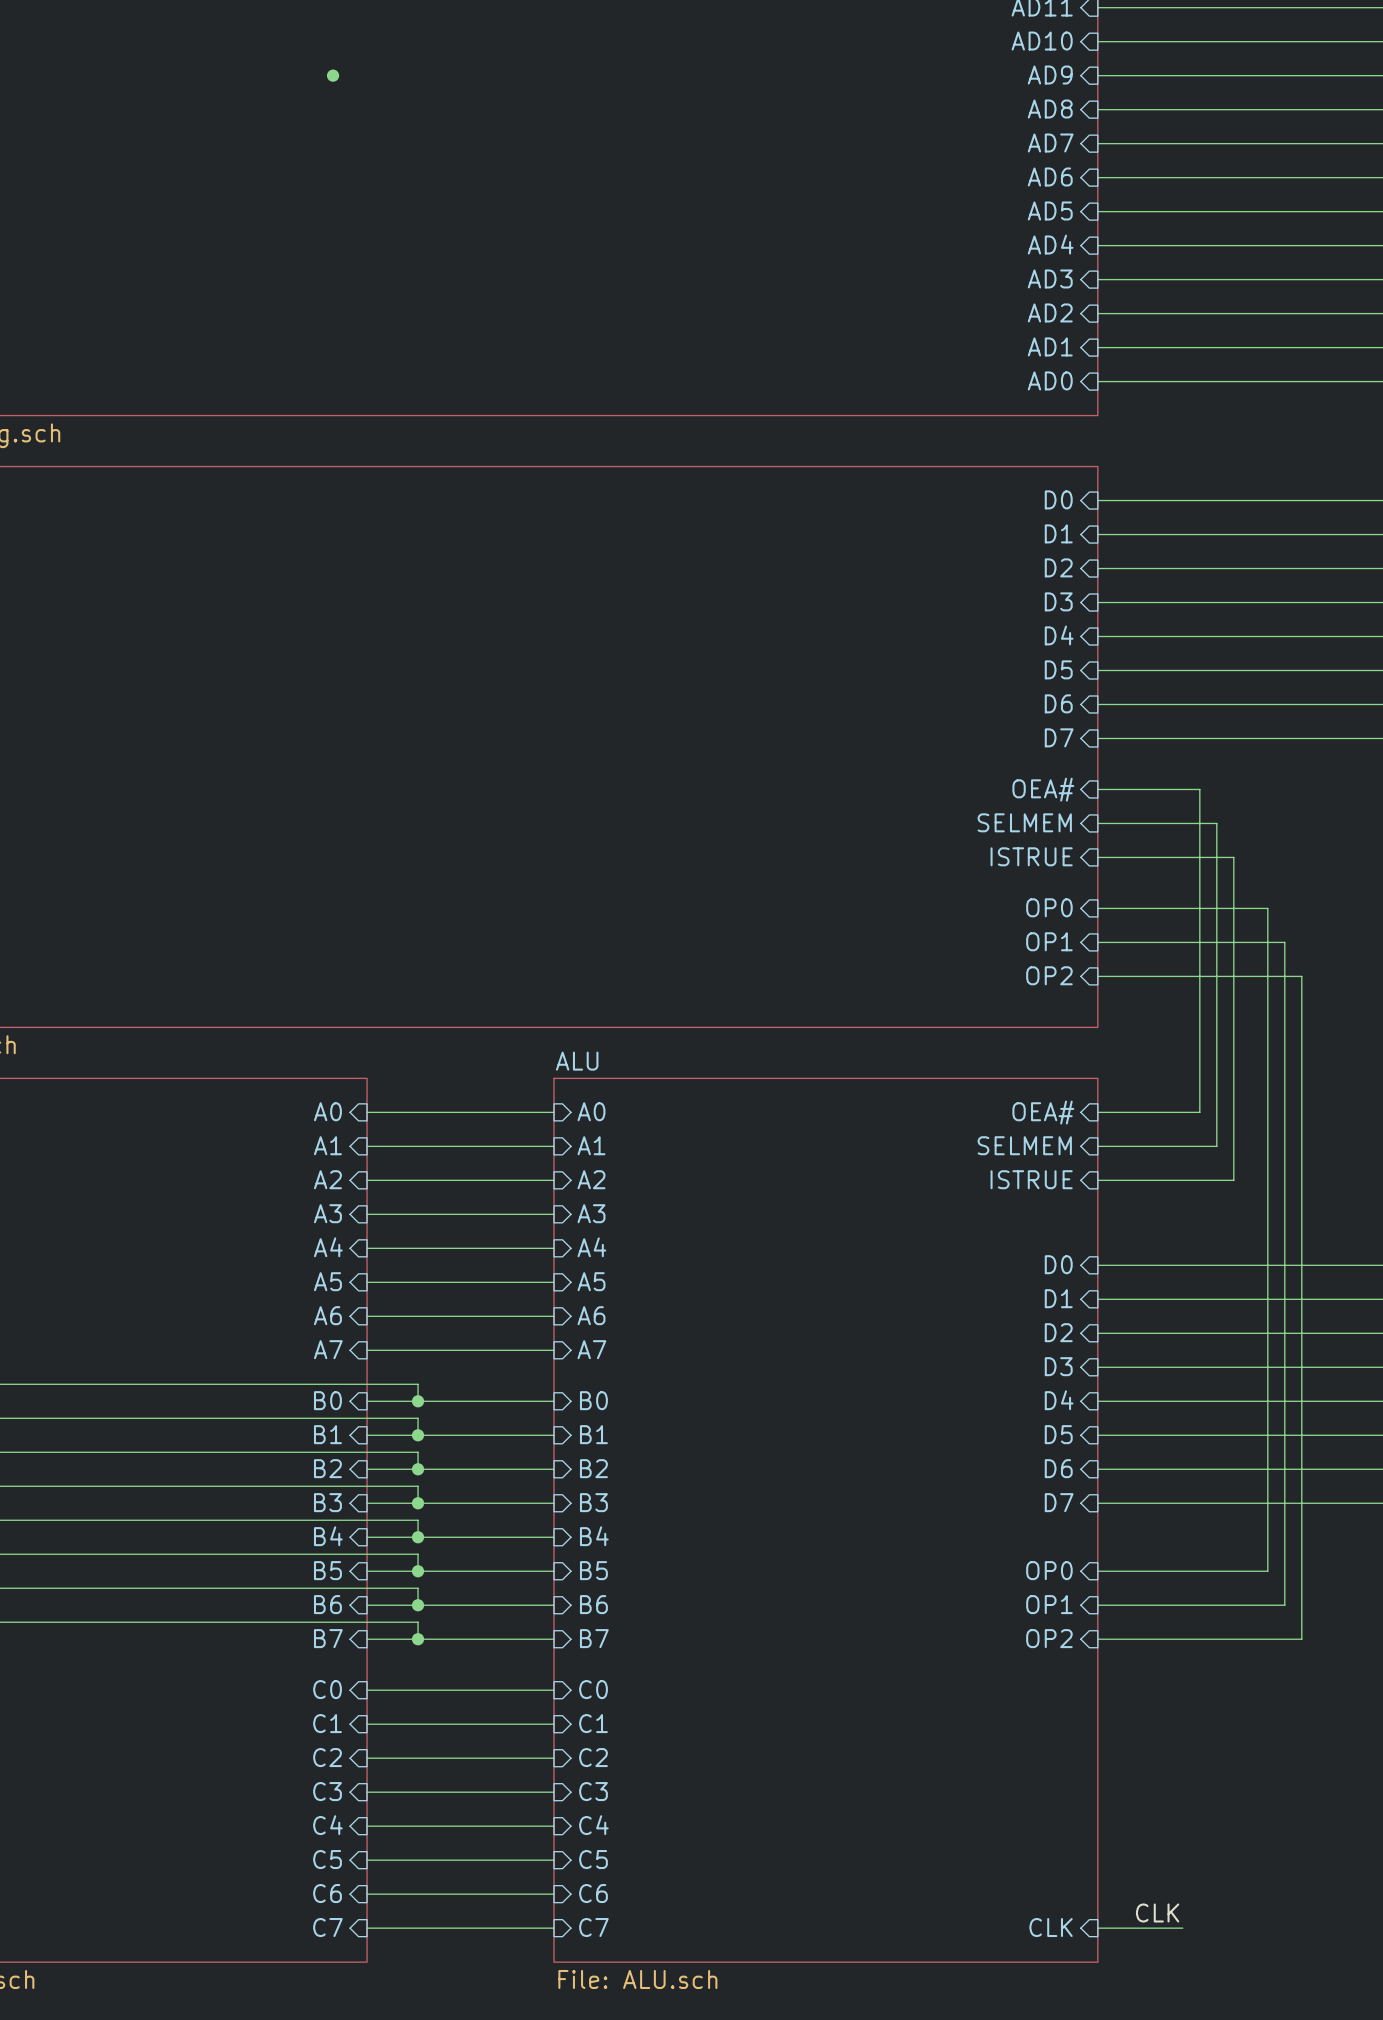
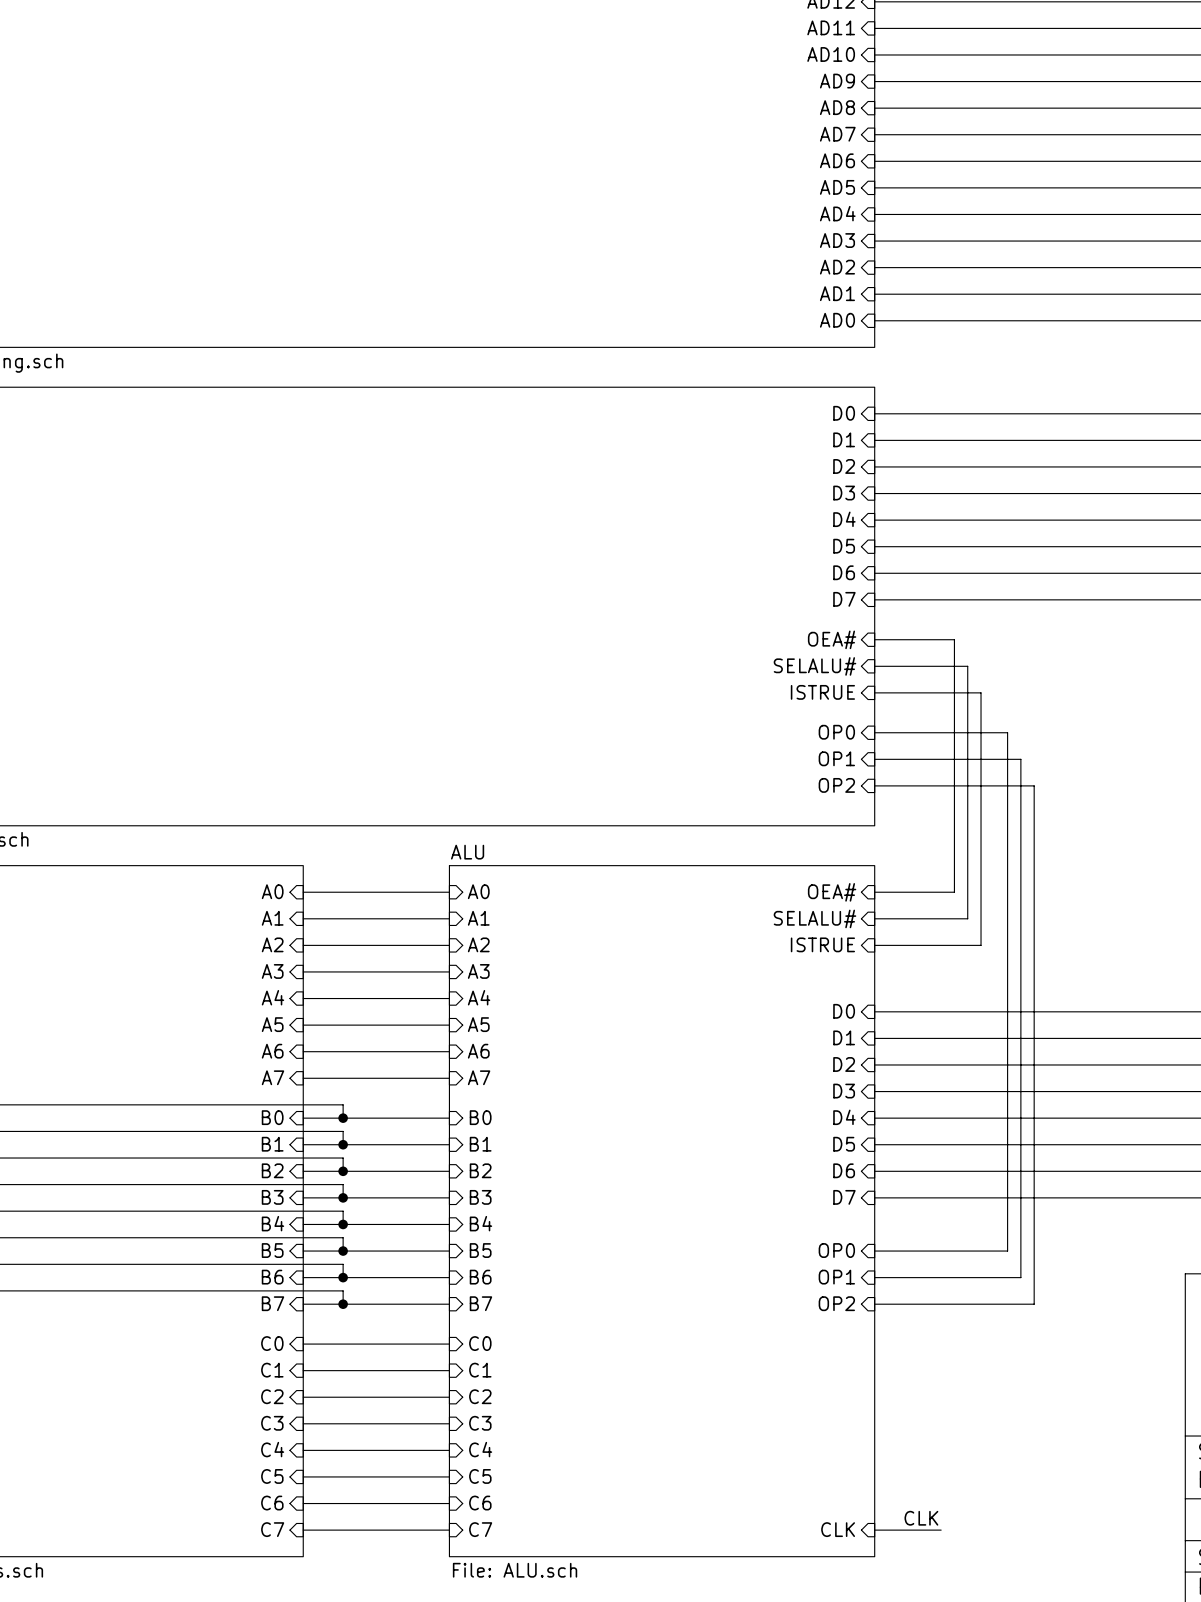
junction: (333, 75) -> none
sheet pin: SELMEM (1024, 822) -> SELALU# (815, 666)
sheet pin: SELMEM (1024, 1145) -> SELALU# (815, 918)

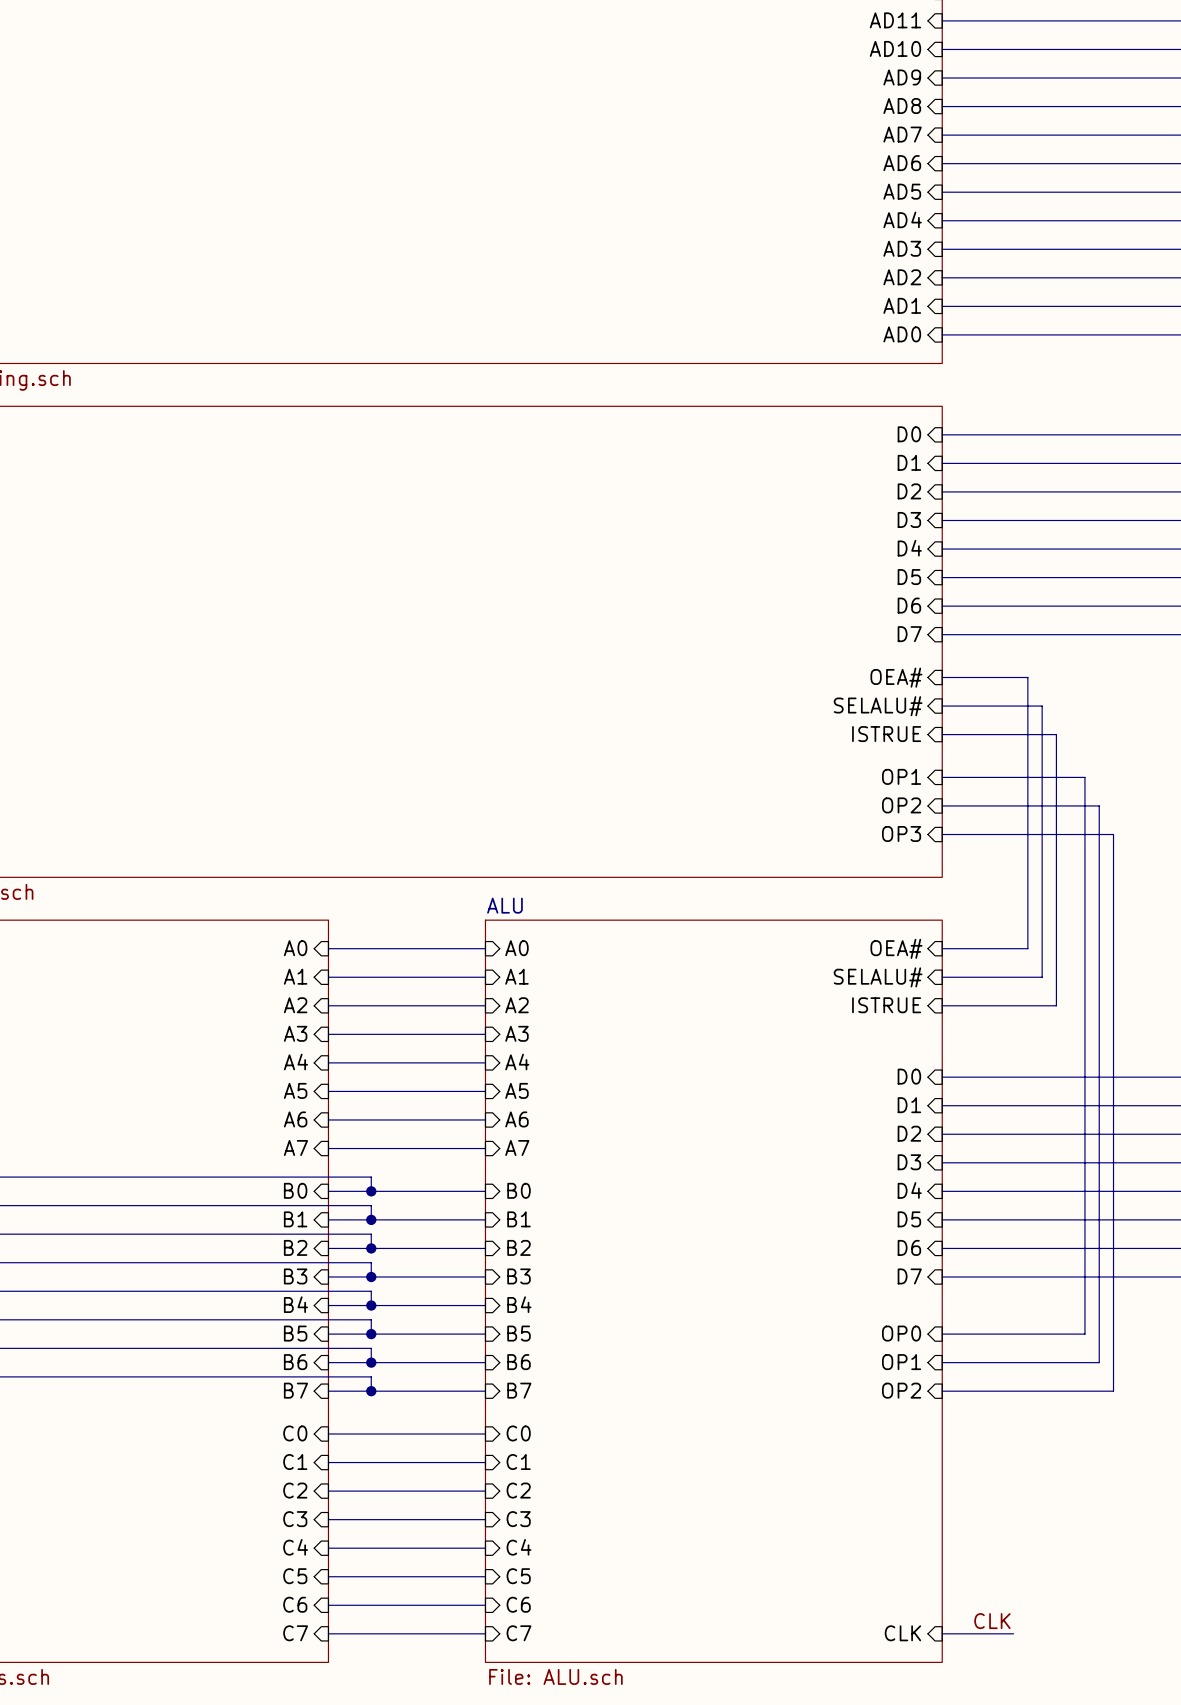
sheet pin: OP0 (836, 732) -> OP1 (901, 776)
sheet pin: OP1 (836, 758) -> OP2 (901, 805)
sheet pin: OP2 (836, 785) -> OP3 (901, 833)

